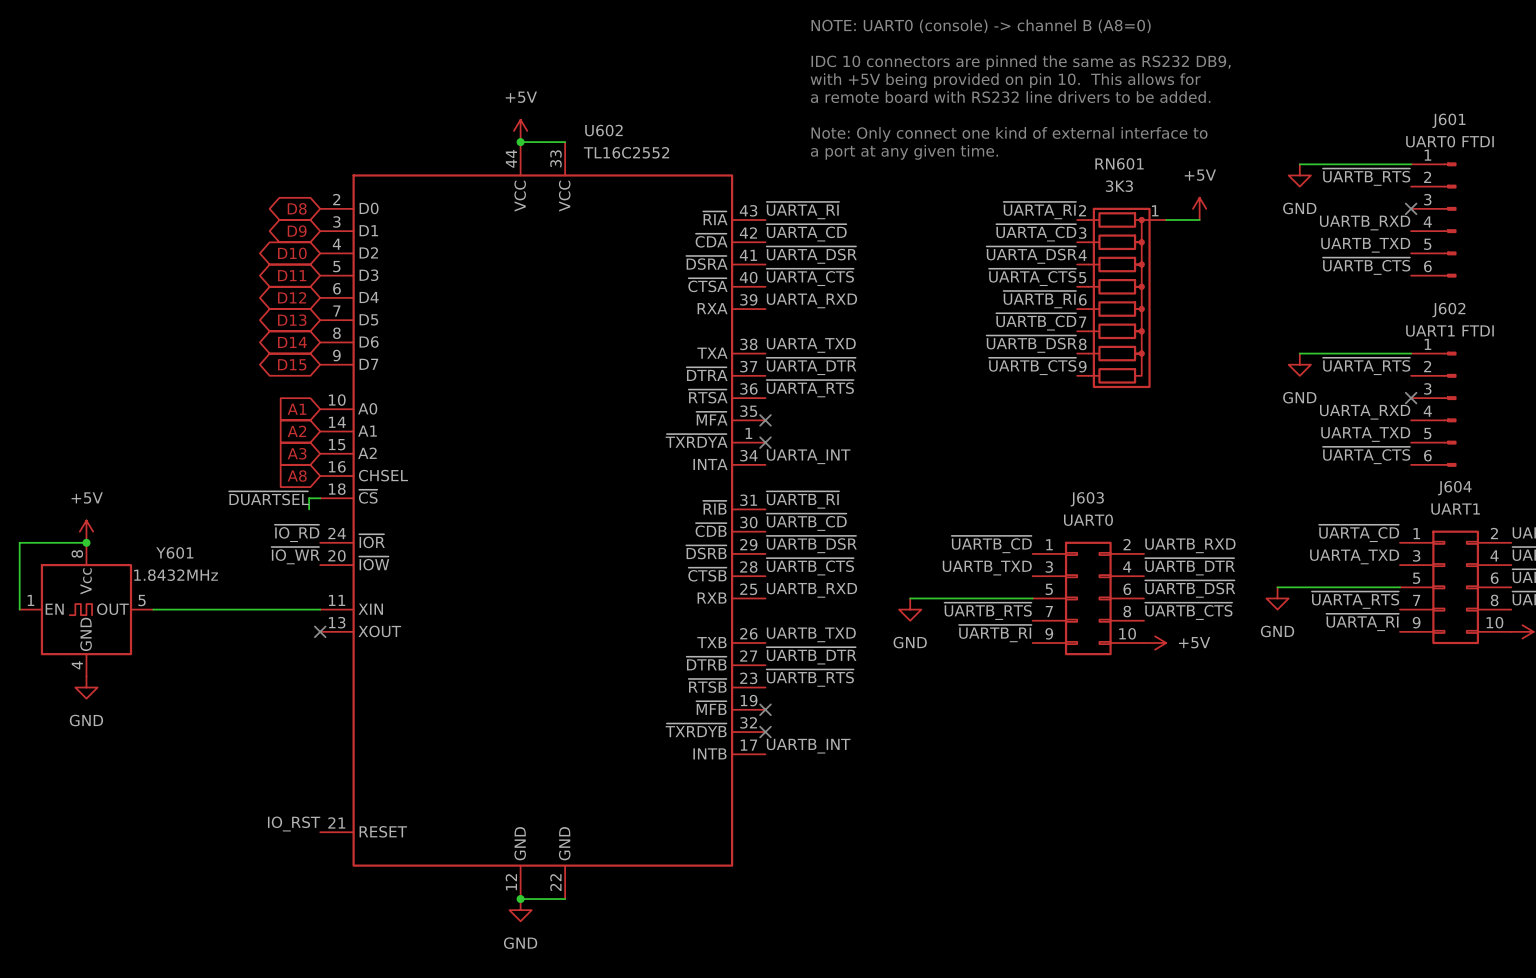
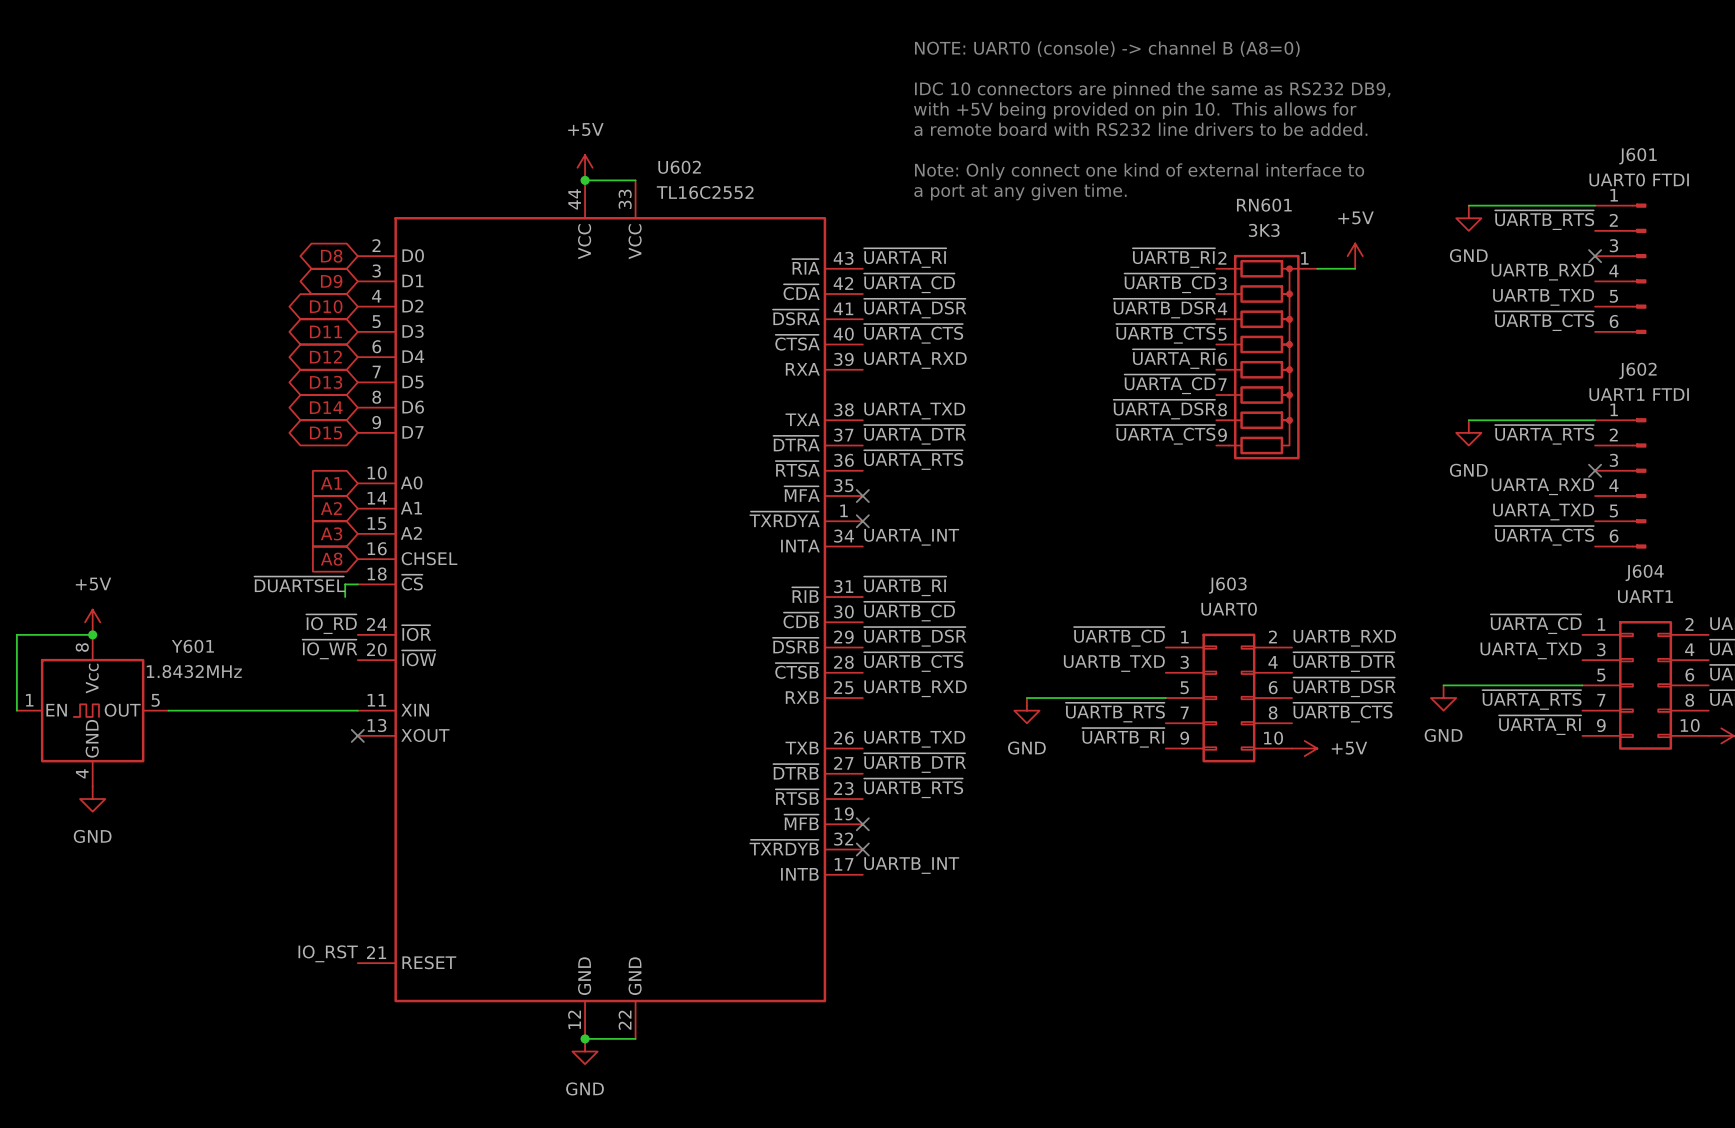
label: ~{UARTA_RI} (1039, 210) -> ~{UARTB_RI} (1173, 258)
label: ~{UARTA_CD} (1036, 232) -> ~{UARTB_CD} (1169, 283)
label: ~{UARTA_DSR} (1031, 255) -> ~{UARTB_DSR} (1164, 308)
label: ~{UARTA_CTS} (1032, 277) -> ~{UARTB_CTS} (1165, 333)
label: ~{UARTB_RI} (1039, 299) -> ~{UARTA_RI} (1173, 359)
label: ~{UARTB_CD} (1036, 321) -> ~{UARTA_CD} (1169, 384)
label: ~{UARTB_DSR} (1031, 344) -> ~{UARTA_DSR} (1164, 409)
label: ~{UARTB_CTS} (1032, 366) -> ~{UARTA_CTS} (1165, 434)

